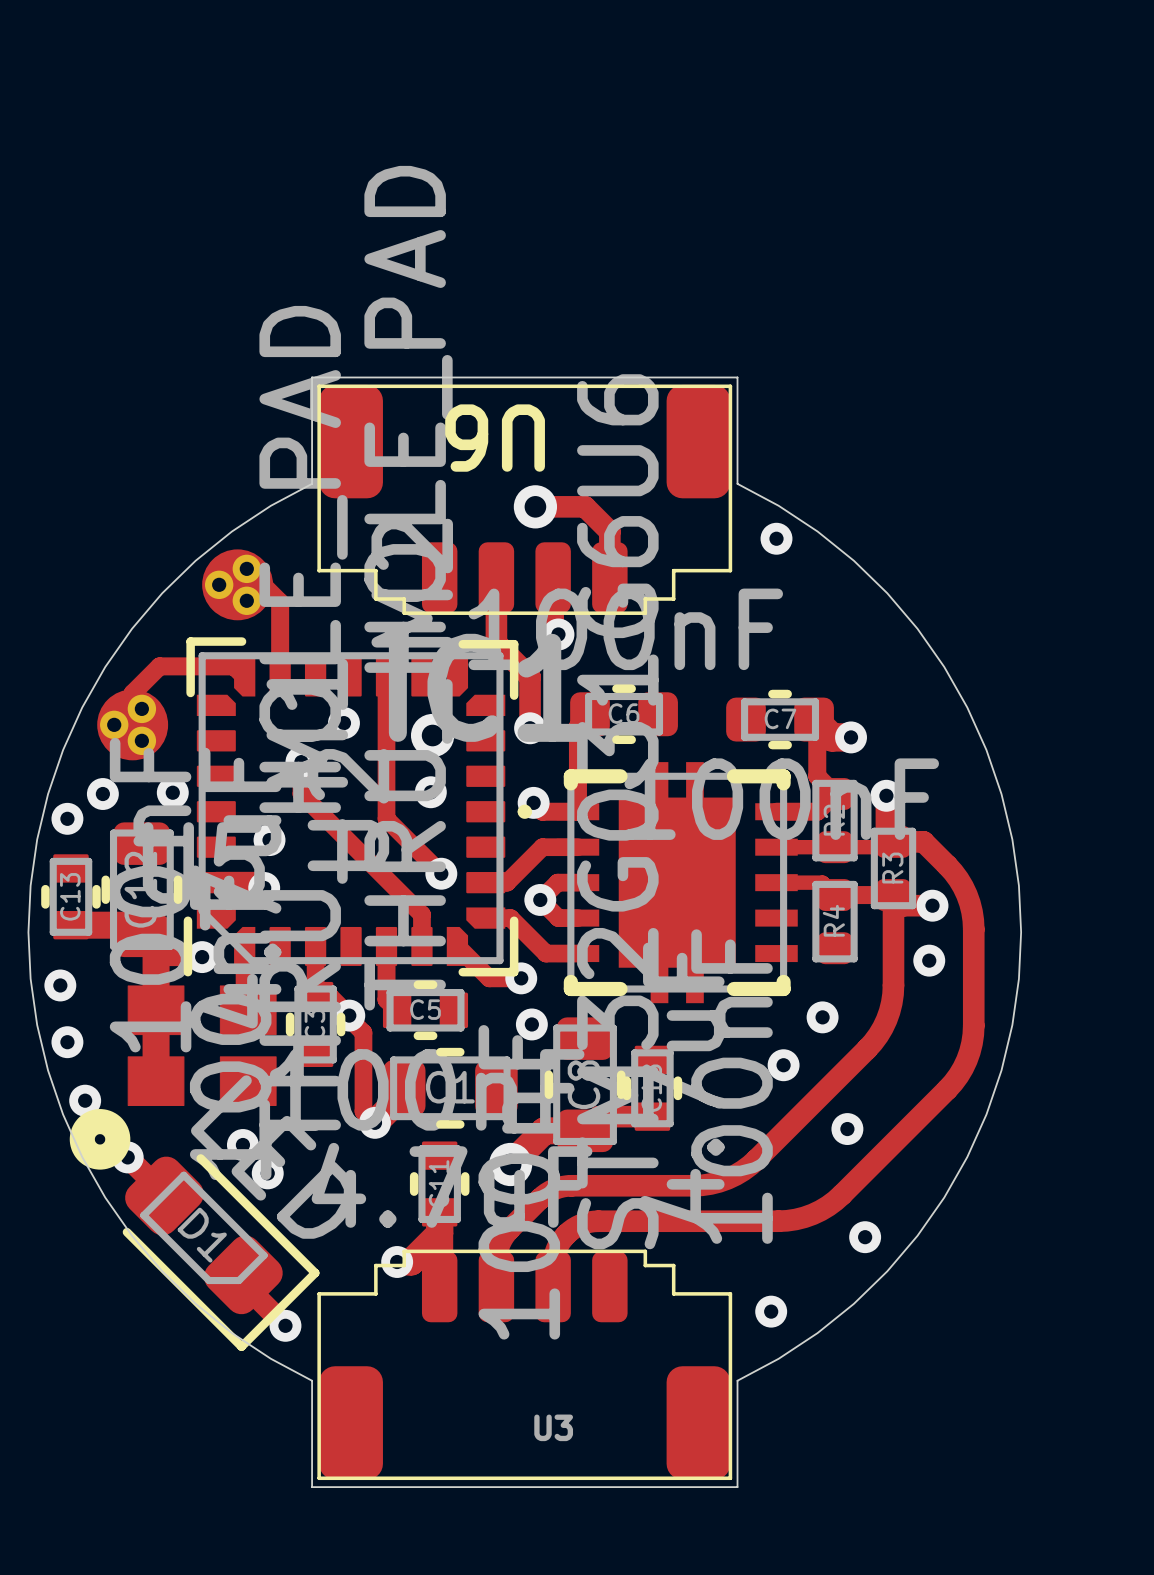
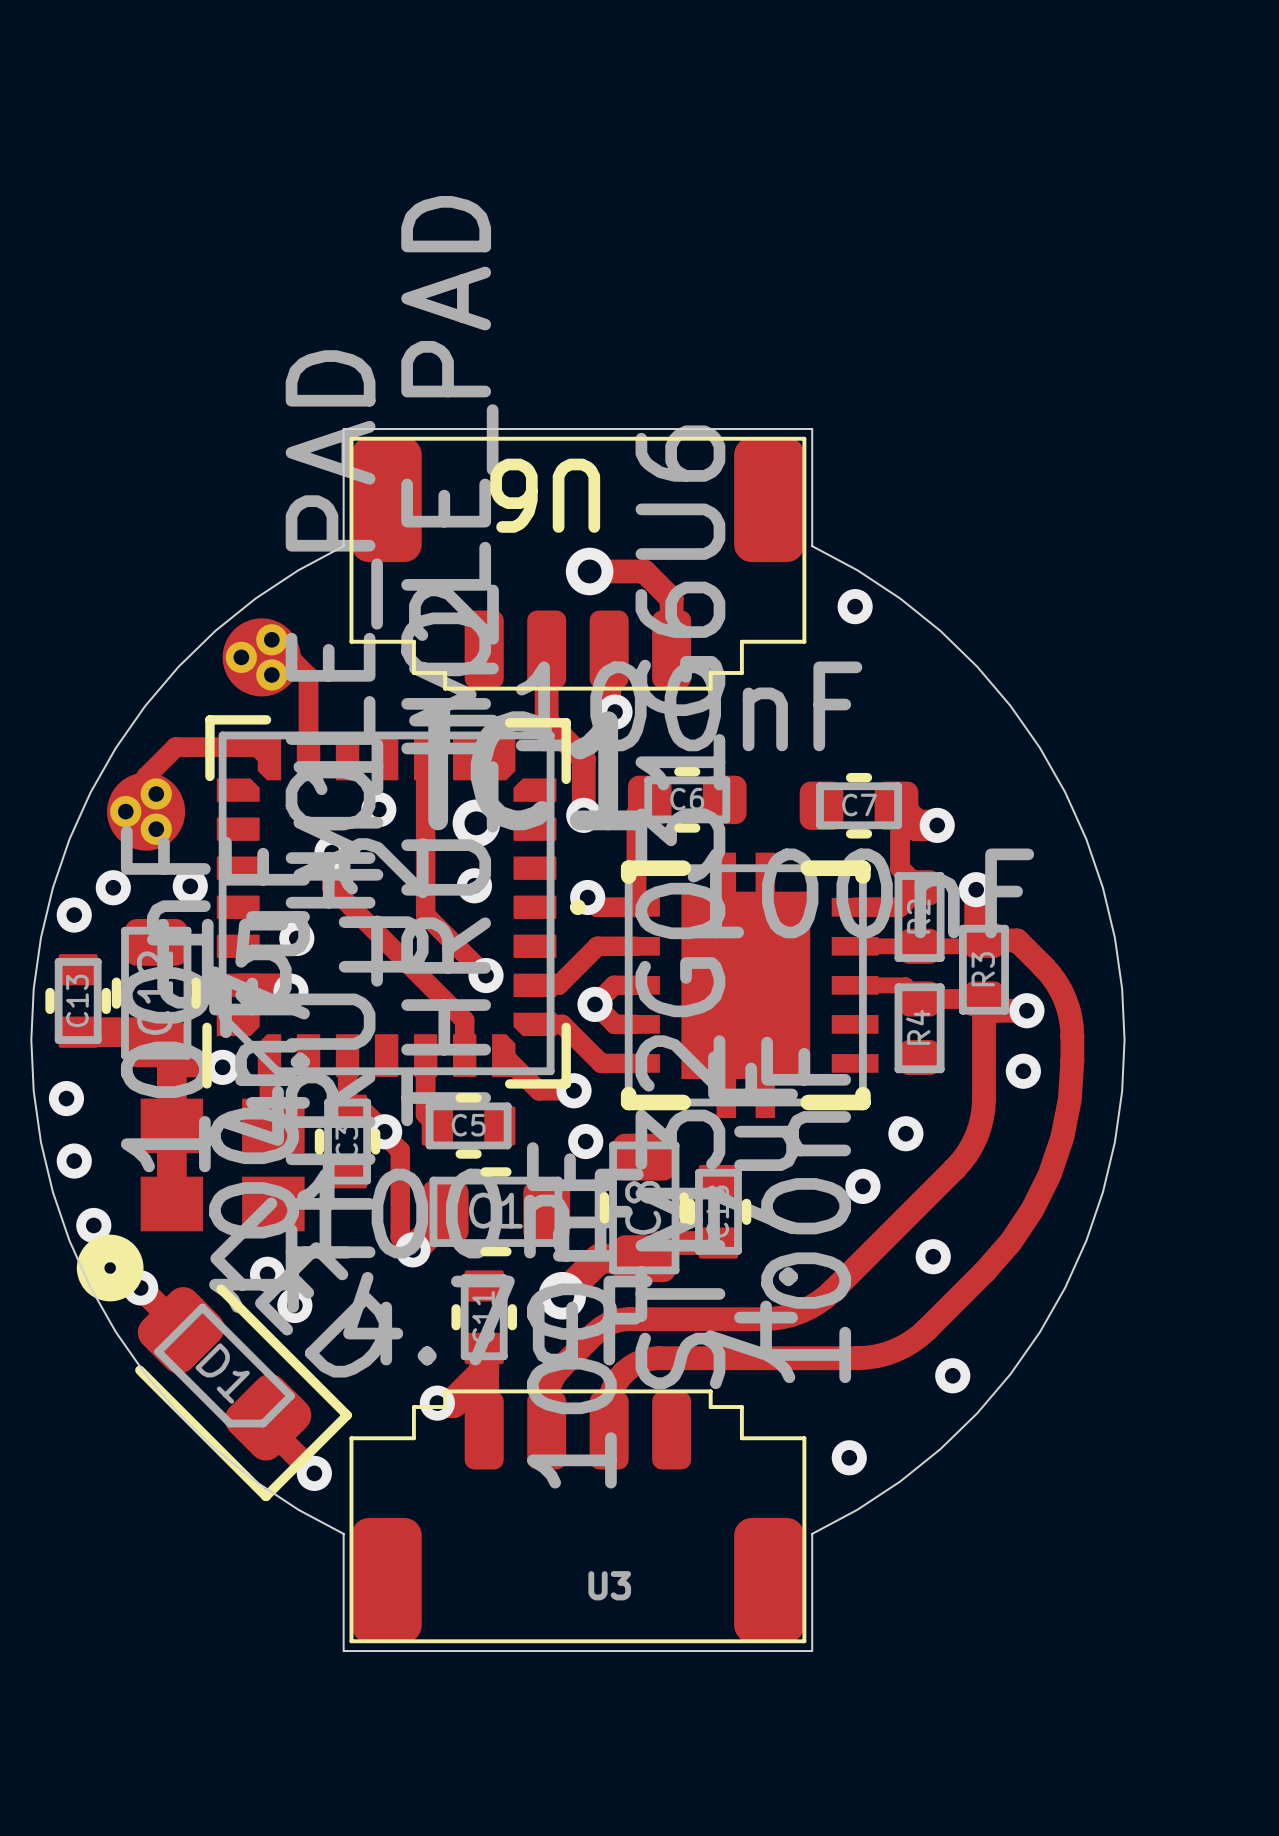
track: (973, 951) (973, 1034) (966, 1060) (953, 1082) (894, 1142) -> (1072, 1060) (1069, 1099) (1062, 1137) (1049, 1174) (1032, 1209) (1010, 1241) (985, 1271)

